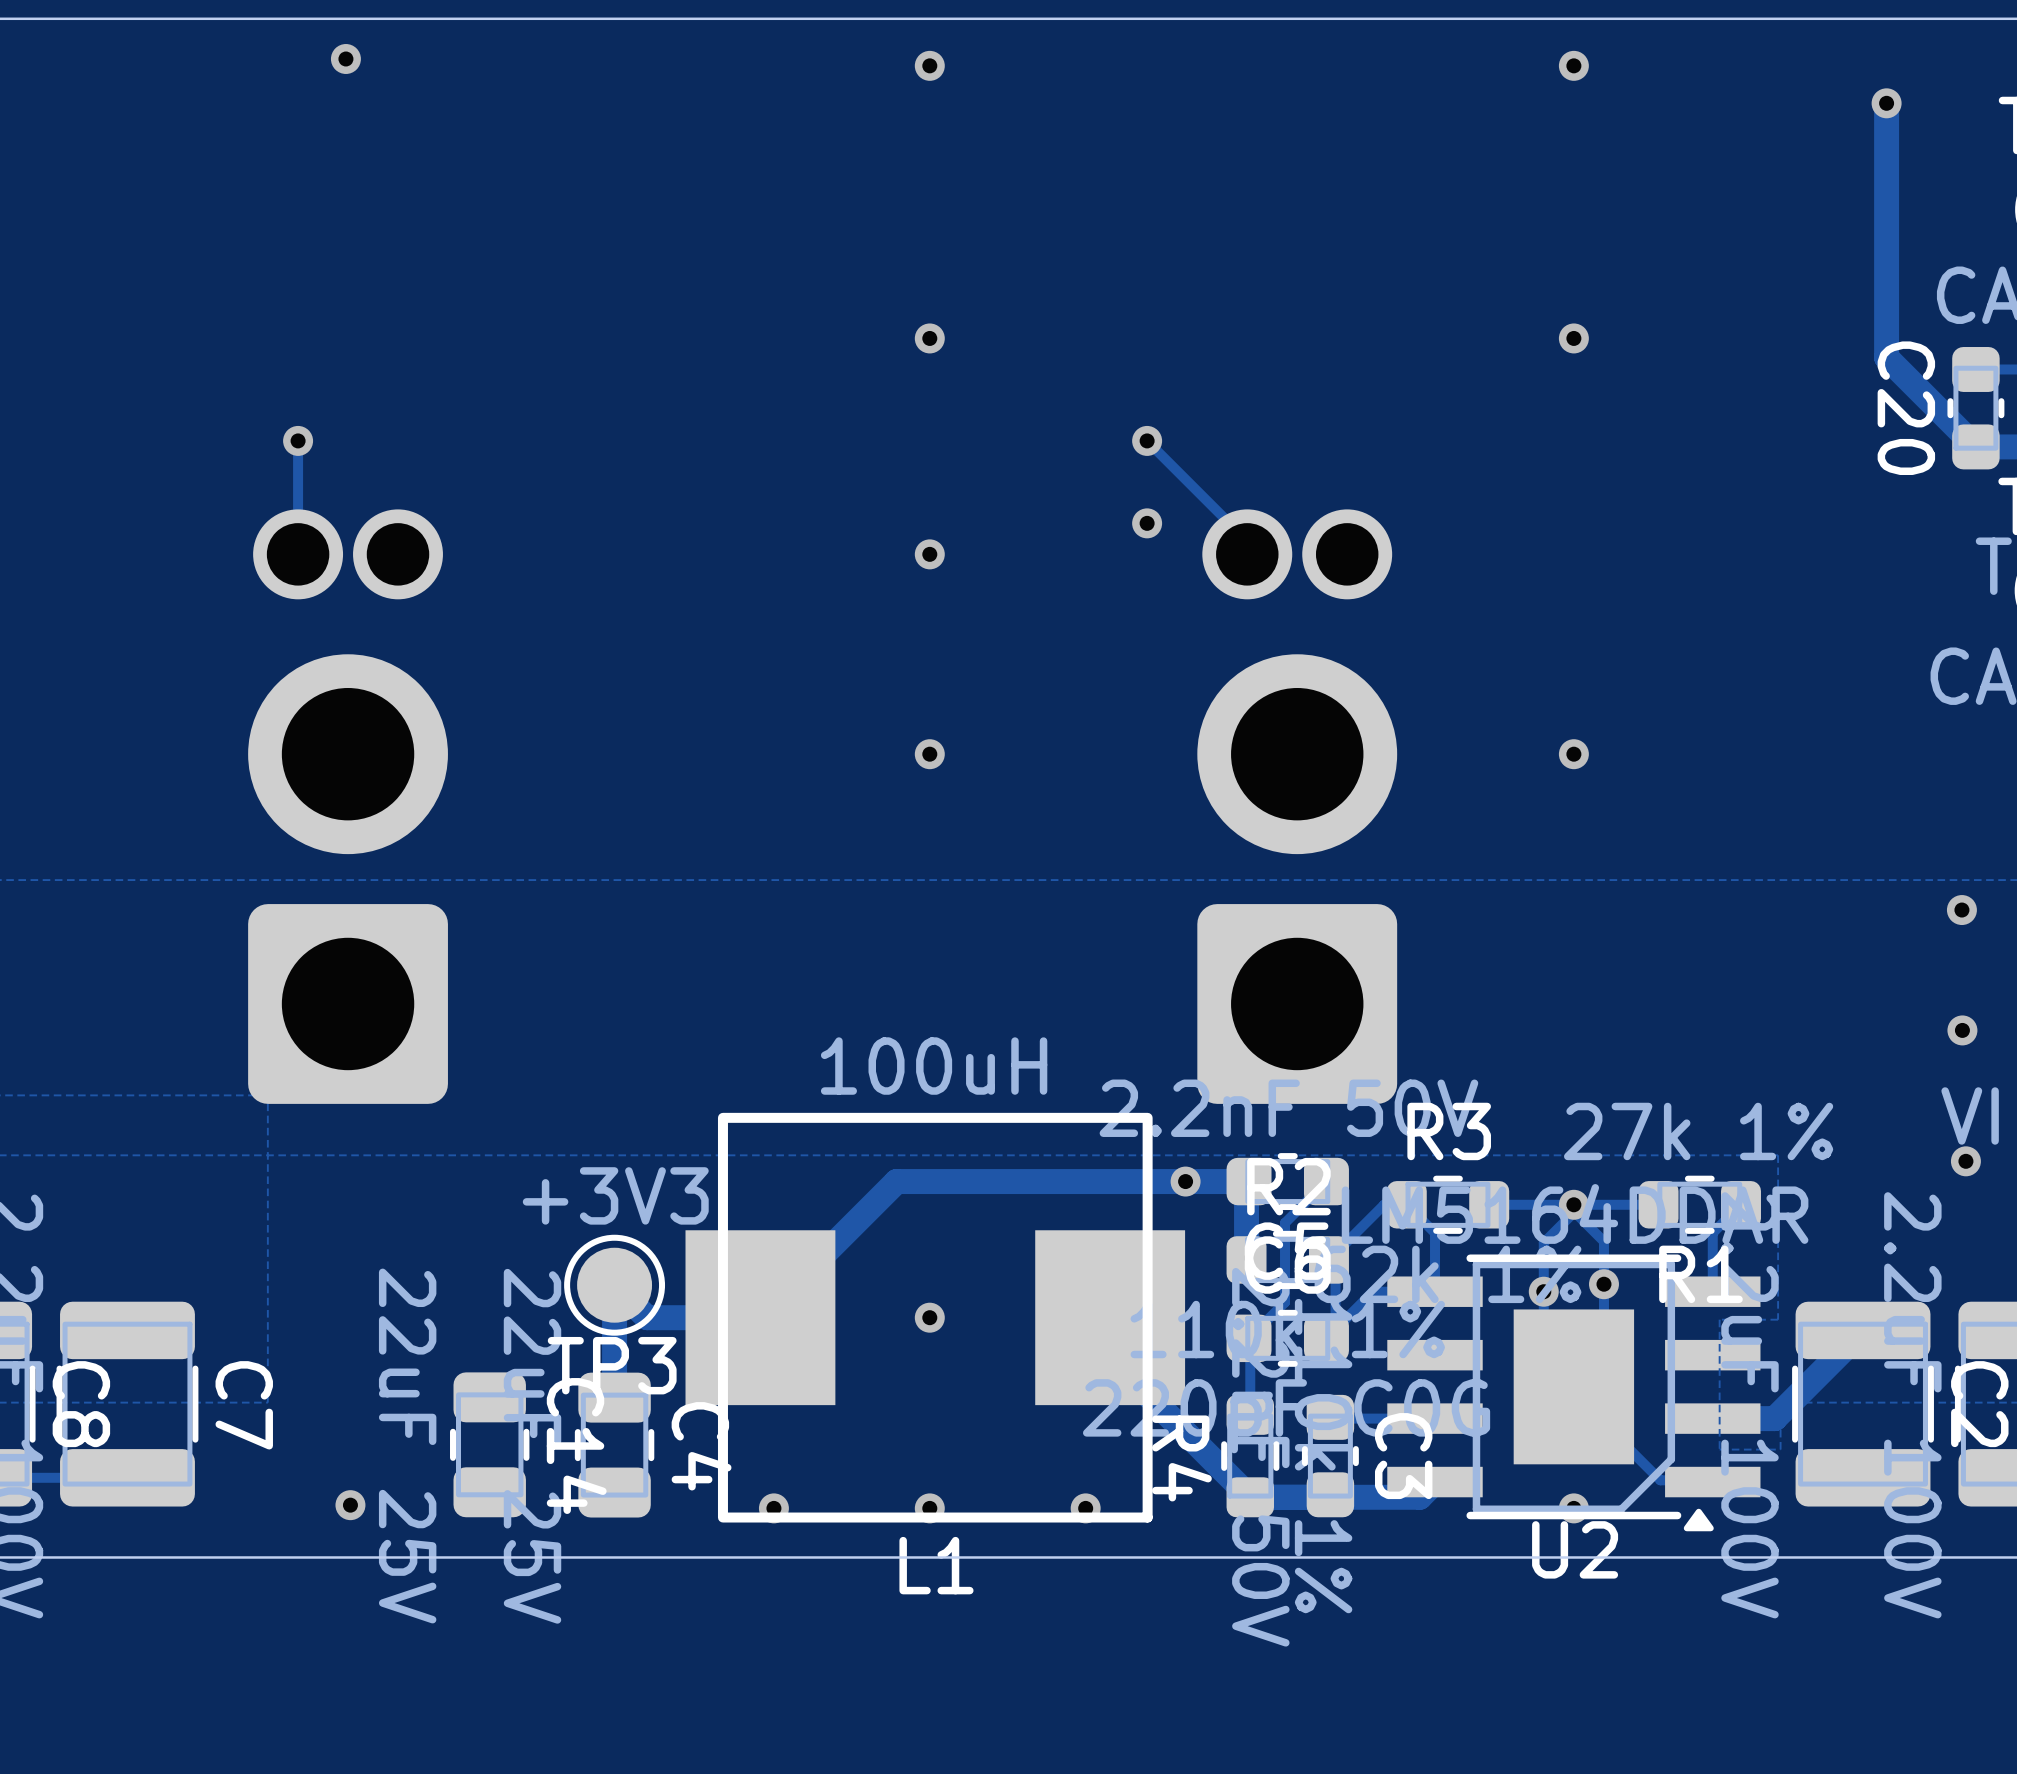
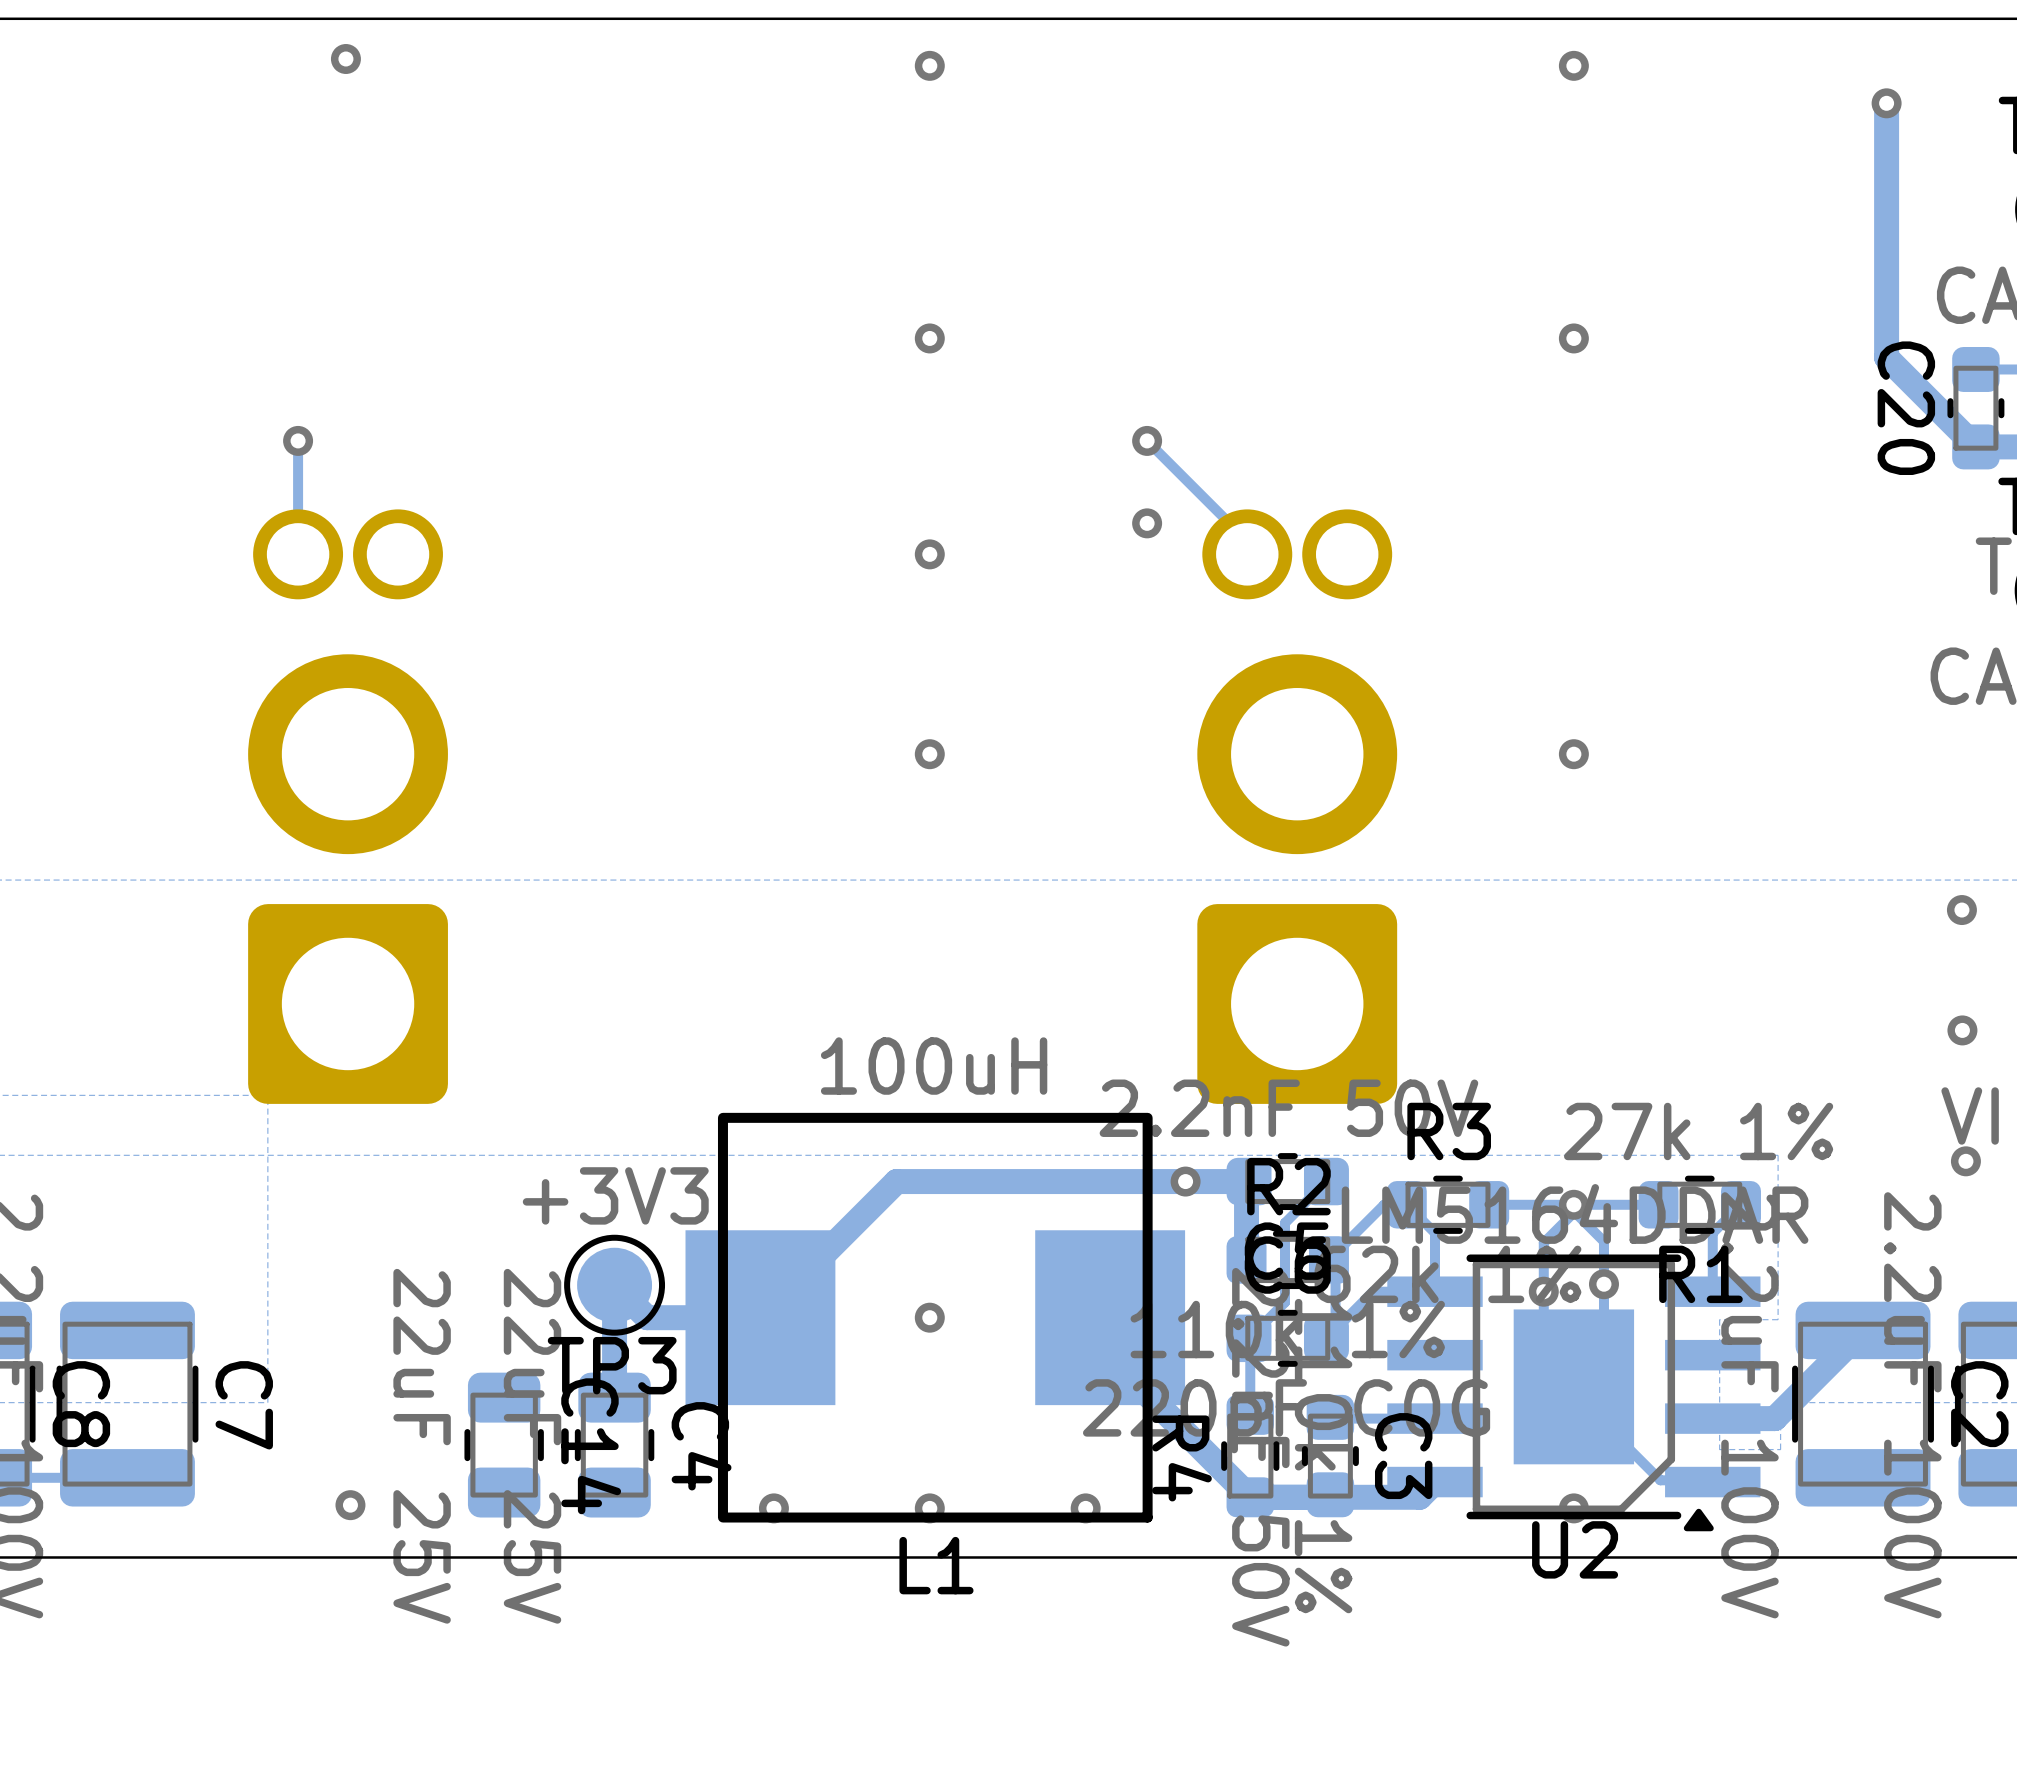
C14 position: (489, 1444) -> (504, 1445)

